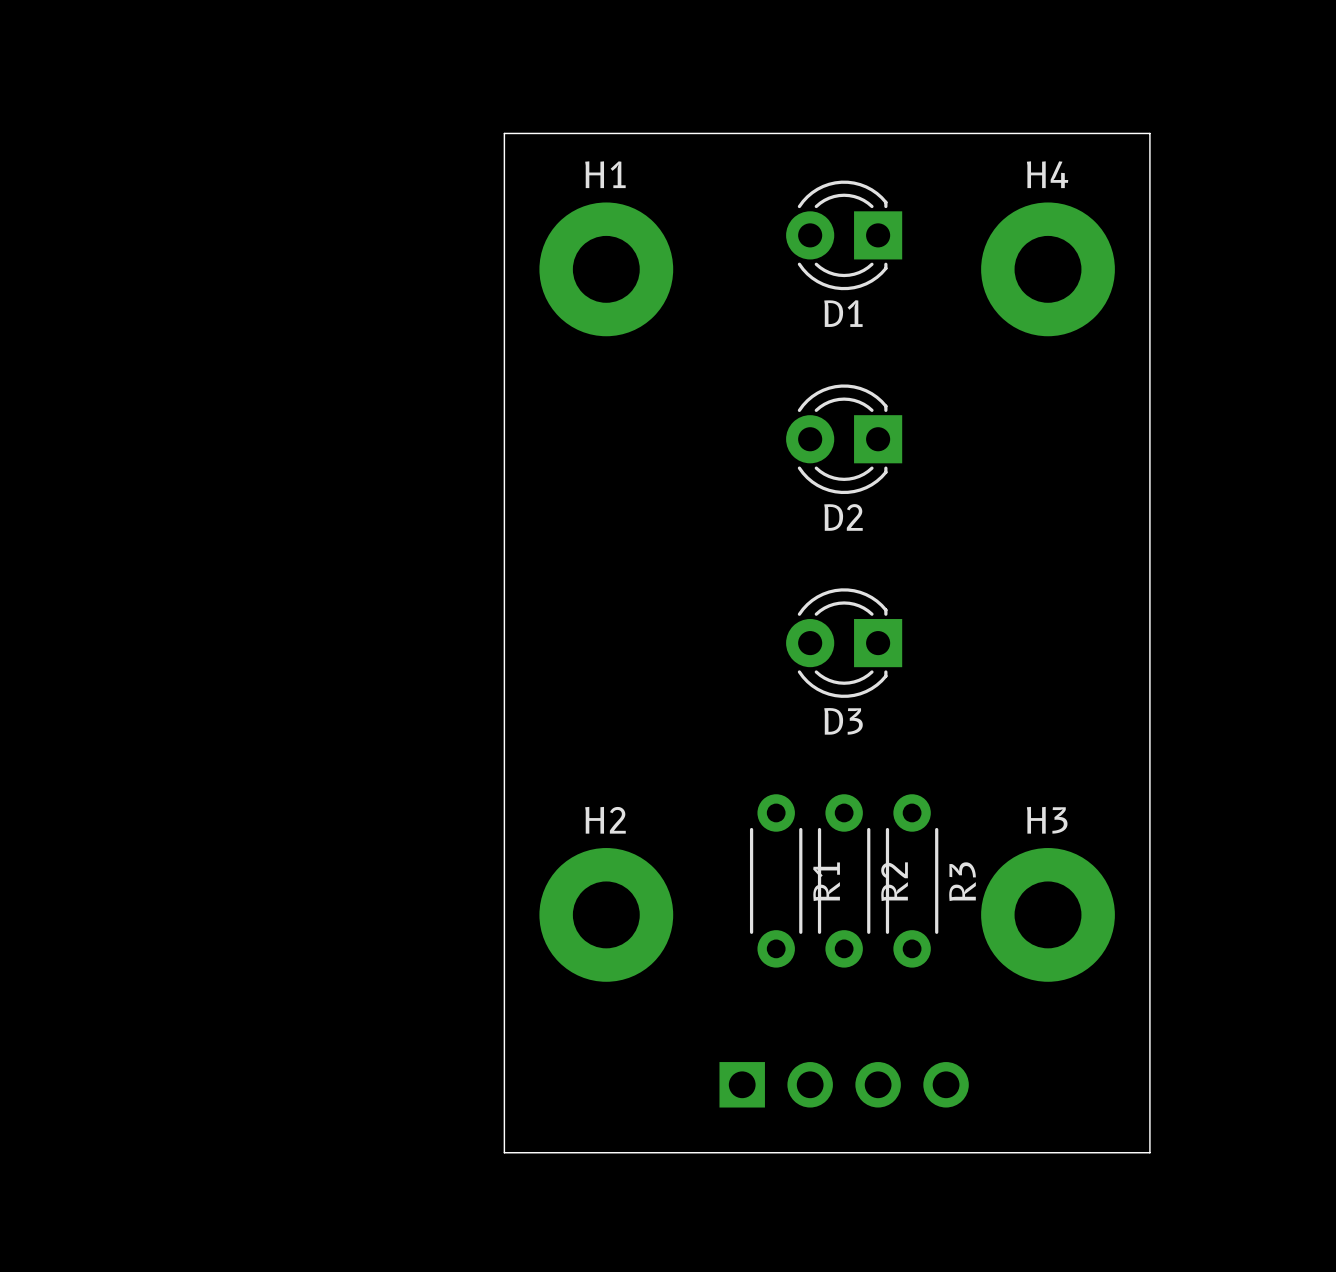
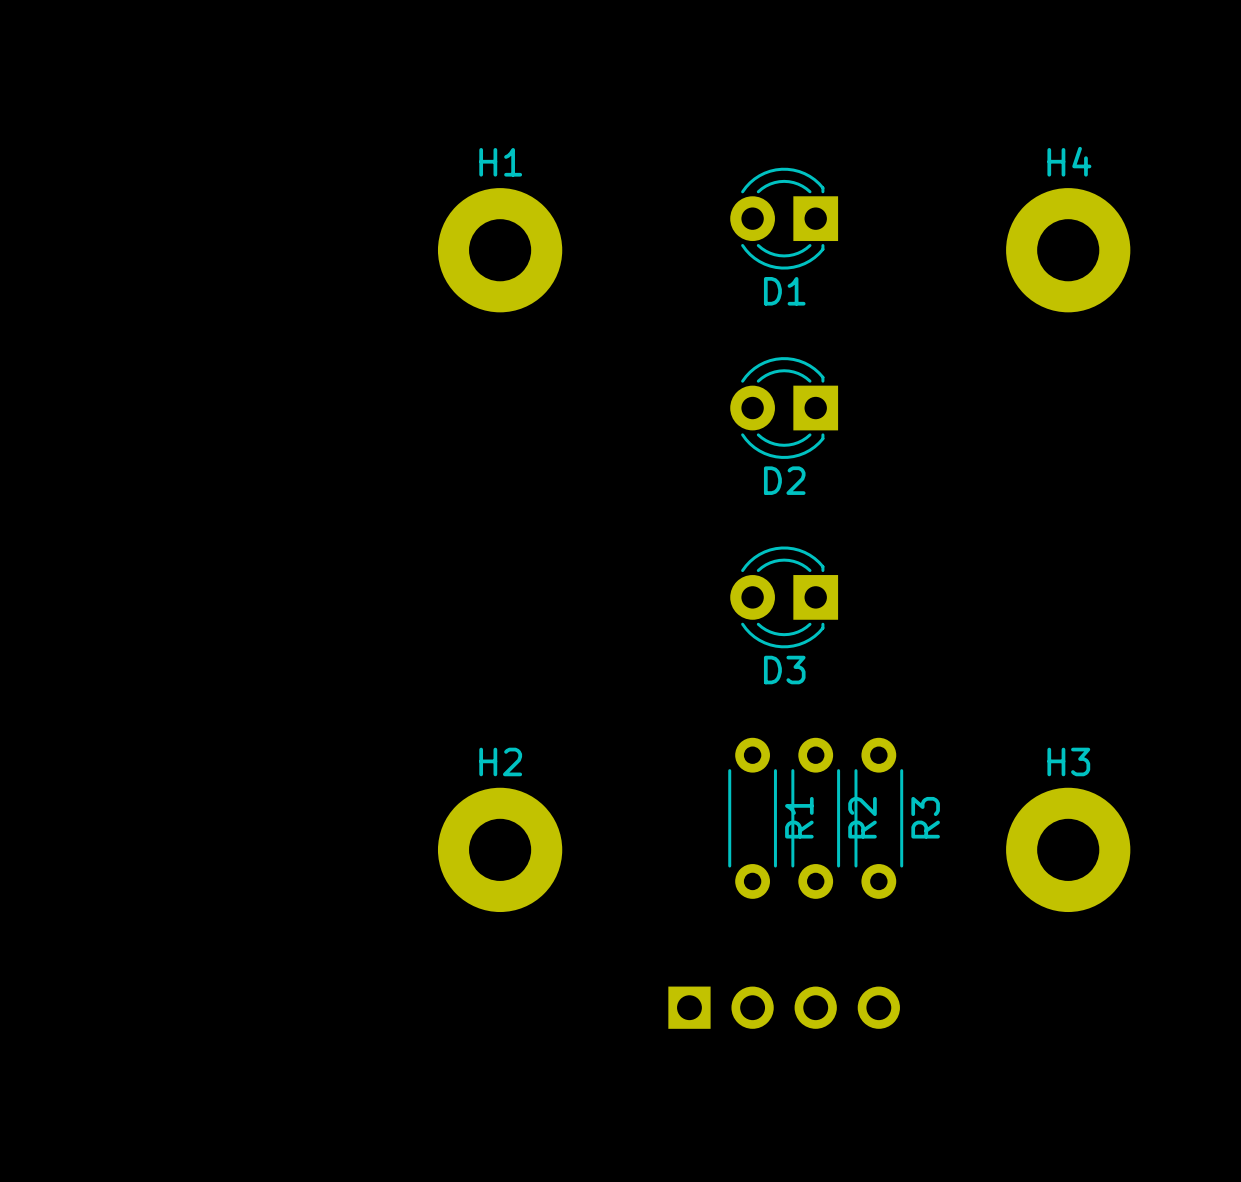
board edge: (504, 133) (504, 1152) (1149, 1152) (1149, 133) (504, 133) -> none
H1 position: (606, 269) -> (500, 250)
H4 position: (1048, 269) -> (1068, 250)
R1 position: (776, 880) -> (752, 818)
R2 position: (844, 880) -> (815, 818)
R3 position: (912, 880) -> (878, 818)
H2 position: (606, 914) -> (500, 849)
H3 position: (1048, 914) -> (1068, 849)

